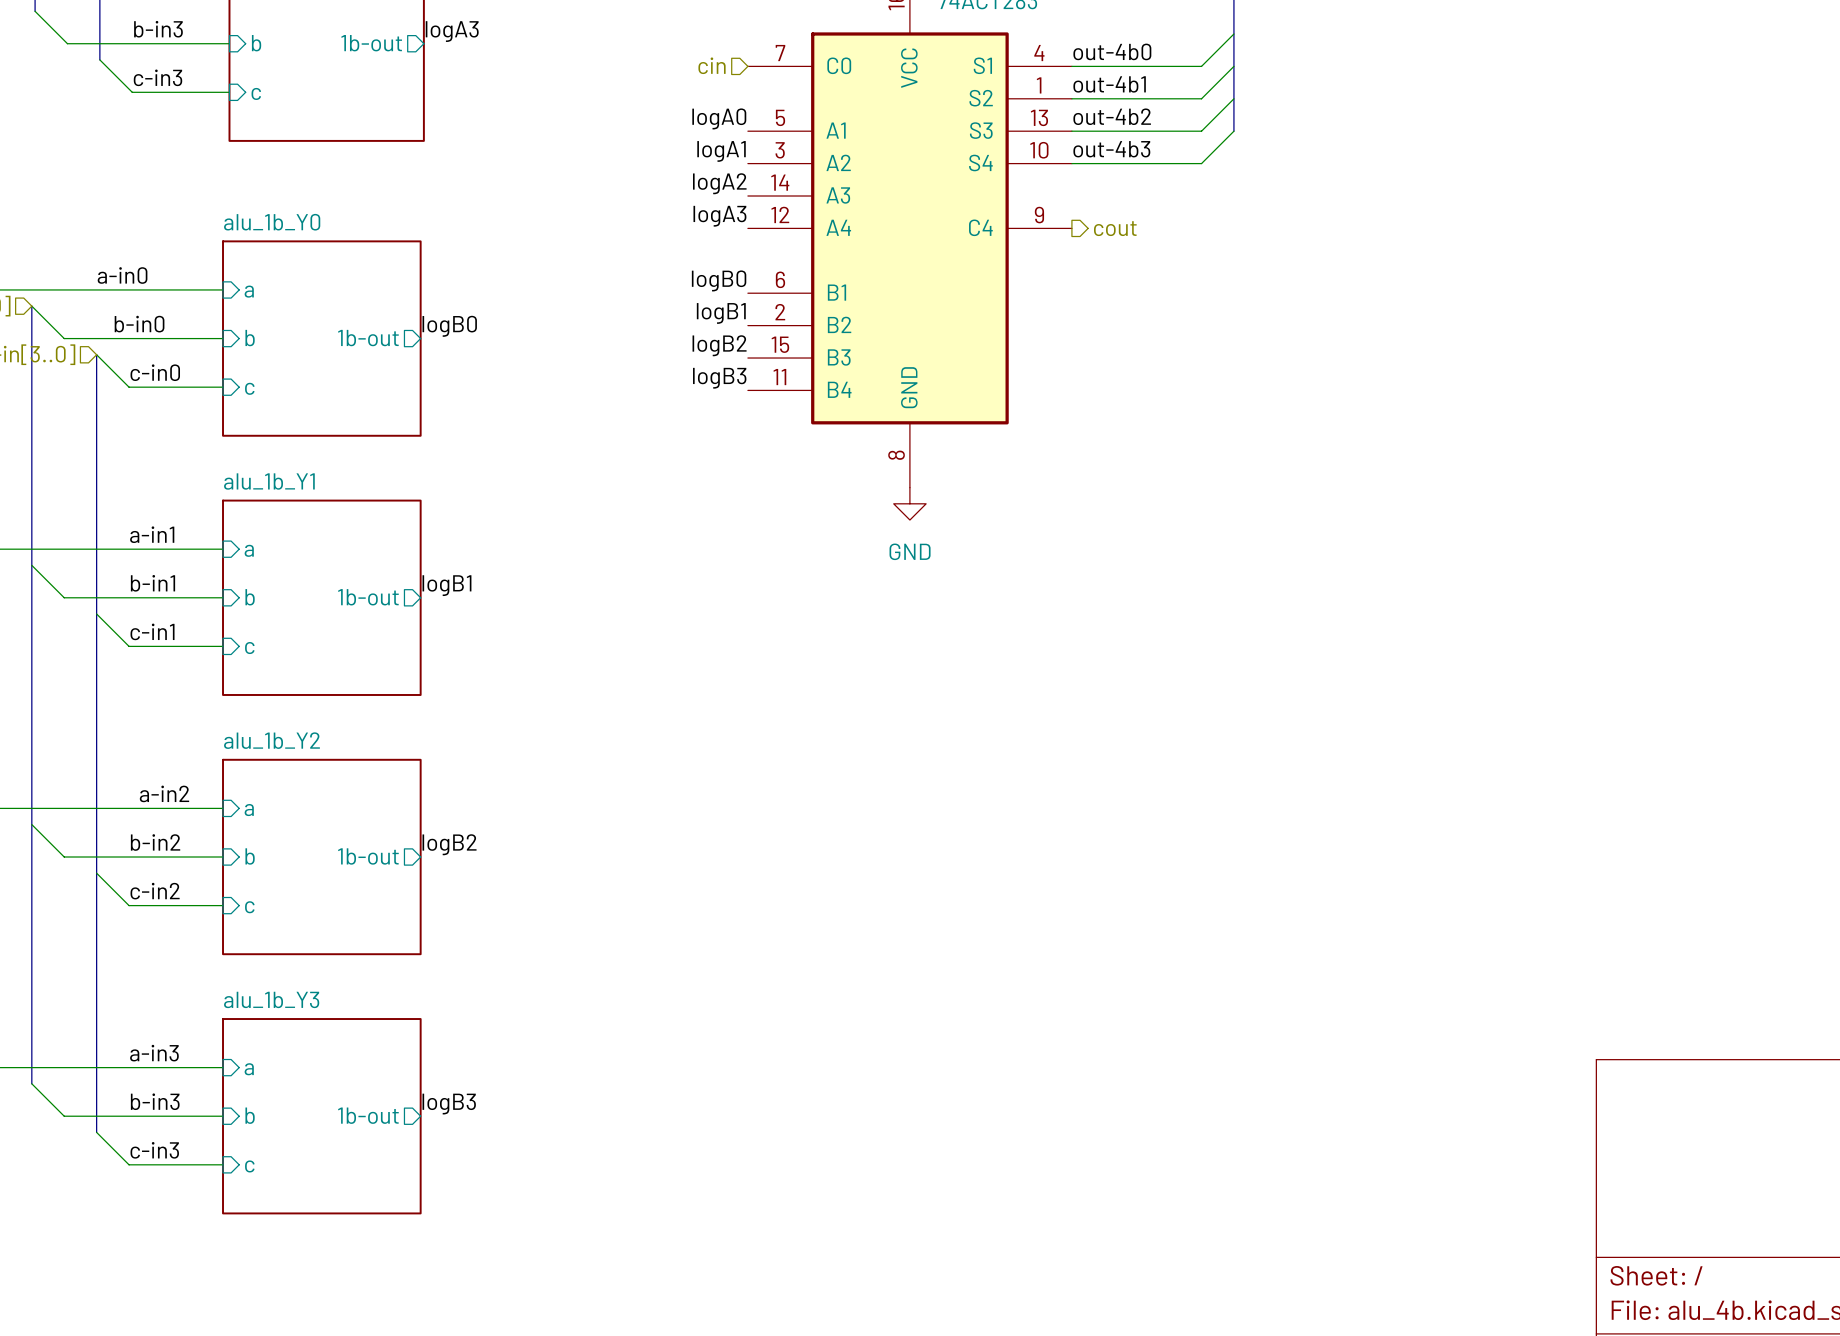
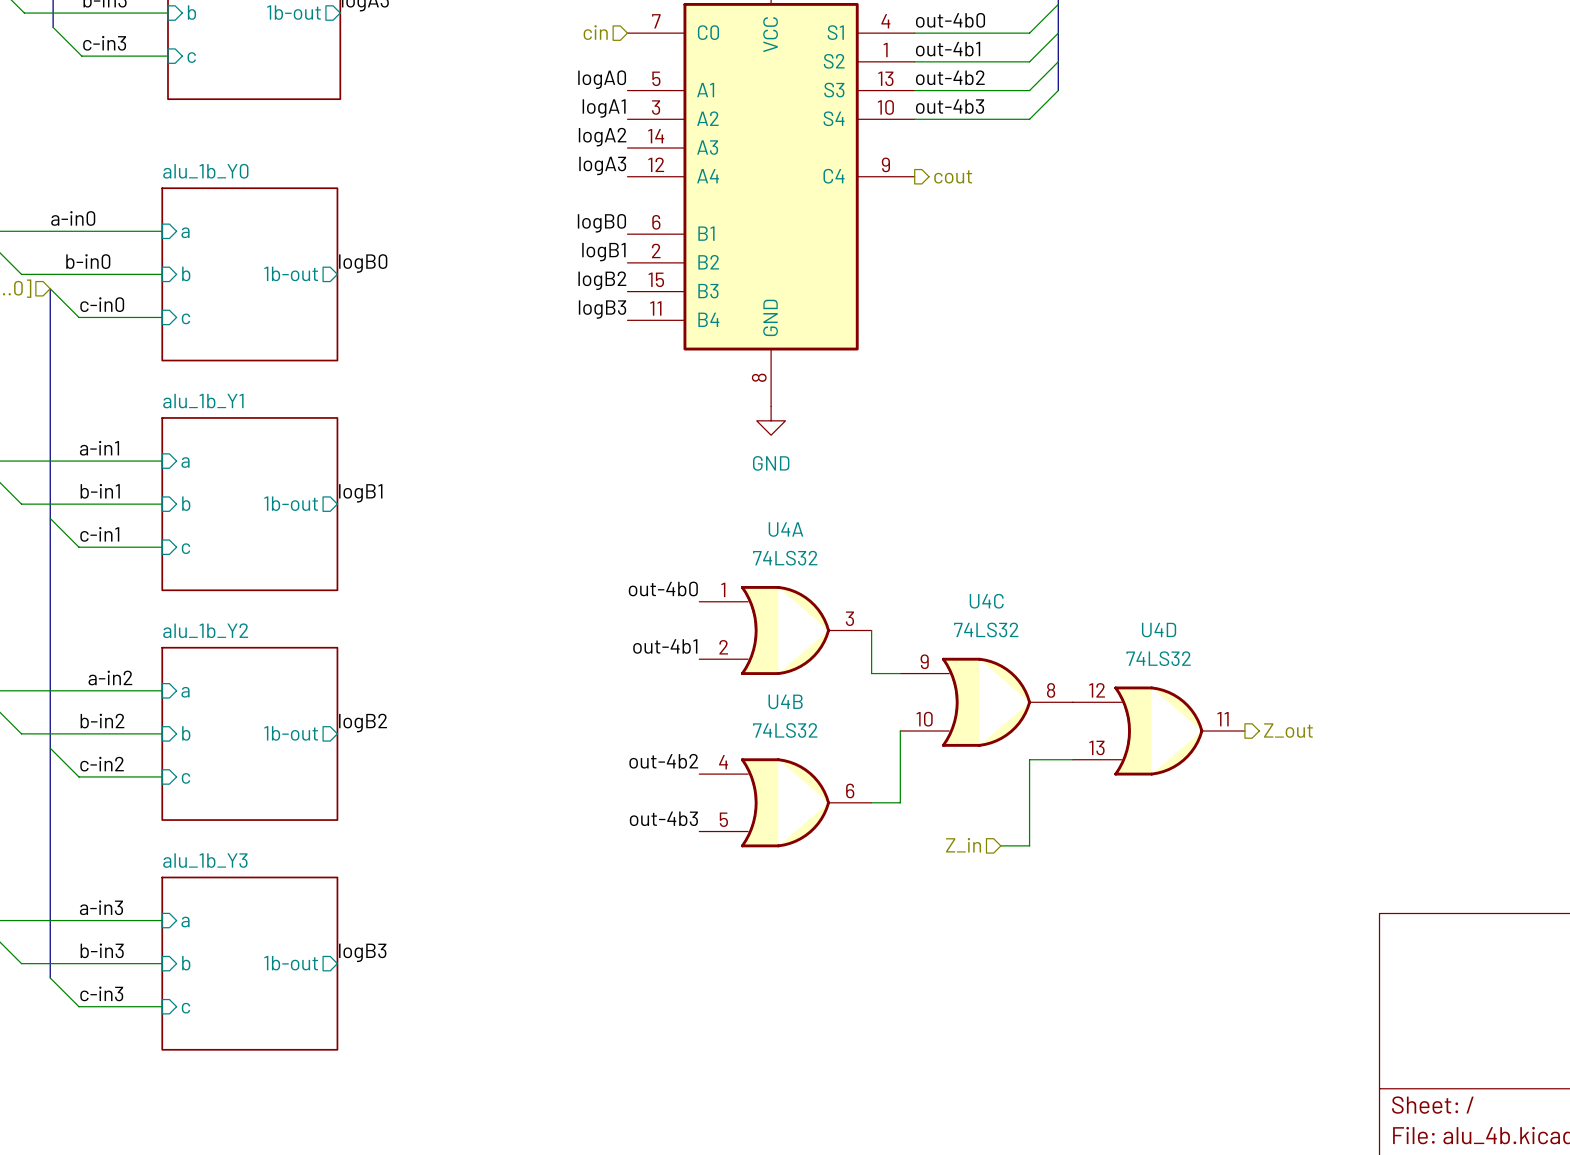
label: none -> out-4b0 (663, 588)
U4A: none -> 74LS32 (785, 630)
wire: none -> (871, 630) (871, 673) (900, 673)
label: none -> out-4b1 (665, 646)
U4C: none -> 74LS32 (986, 702)
wire: none -> (900, 731) (900, 802) (871, 802)
U4D: none -> 74LS32 (1158, 731)
hierarchical label: none -> Z_out (1288, 730)
wire: none -> (1072, 759) (1029, 759) (1029, 845) (1000, 845)
label: none -> out-4b2 (663, 761)
U4B: none -> 74LS32 (785, 802)
label: none -> out-4b3 (663, 818)
hierarchical label: none -> Z_in (963, 845)

